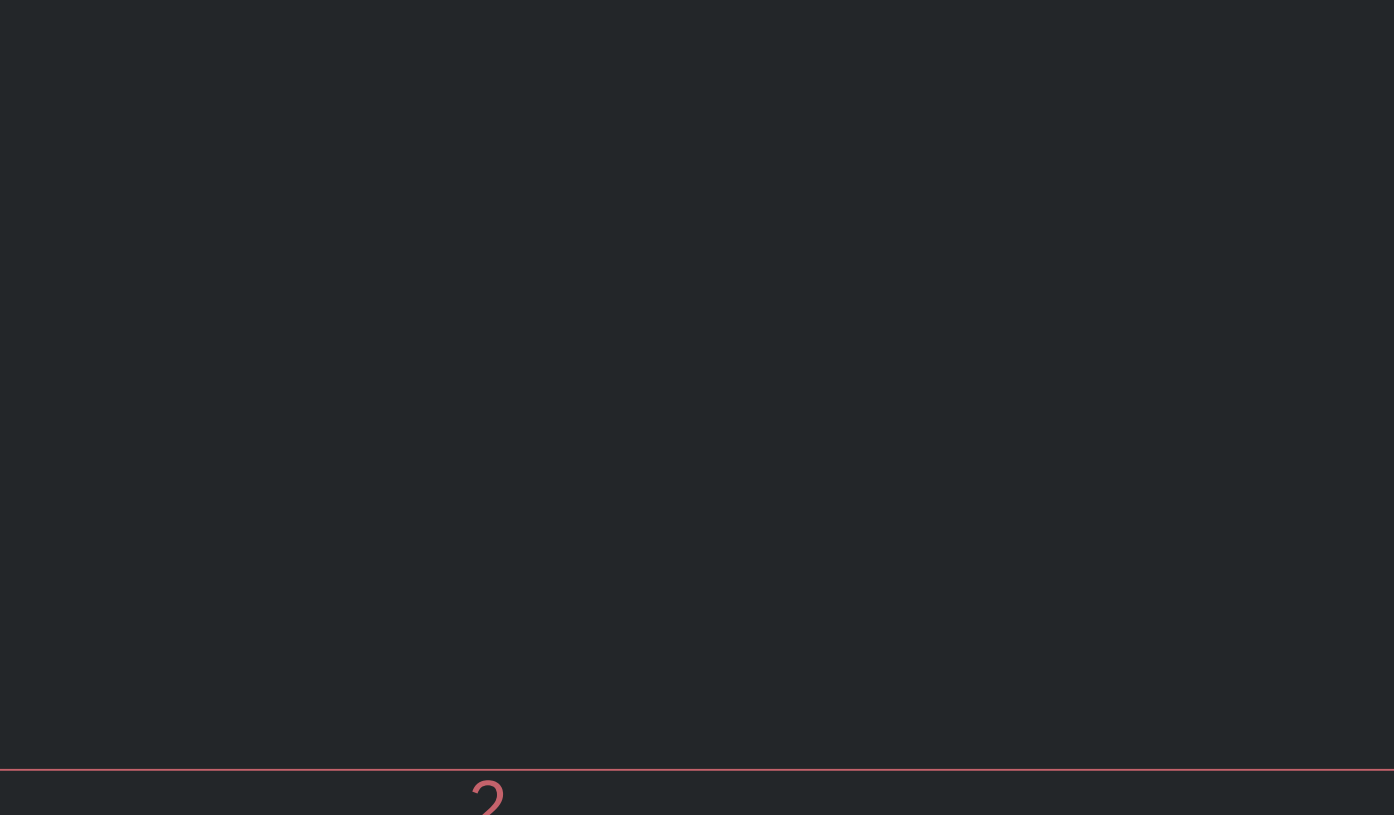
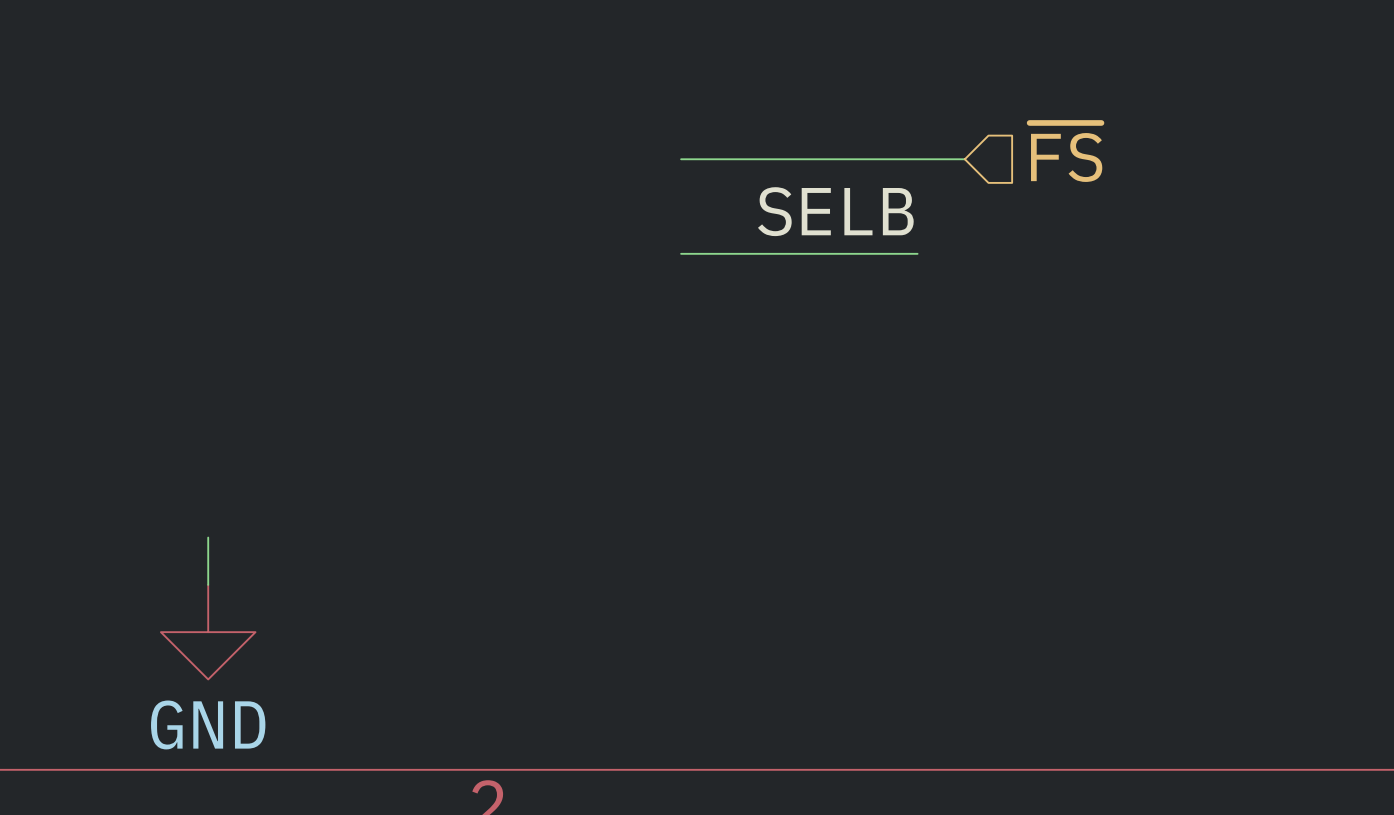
hierarchical label: none -> ~{FS} (1065, 152)
wire: none -> (681, 159) (964, 159)
label: none -> SELB (835, 211)
wire: none -> (681, 253) (917, 253)
wire: none -> (208, 537) (208, 584)
power symbol: none -> GND (208, 632)

